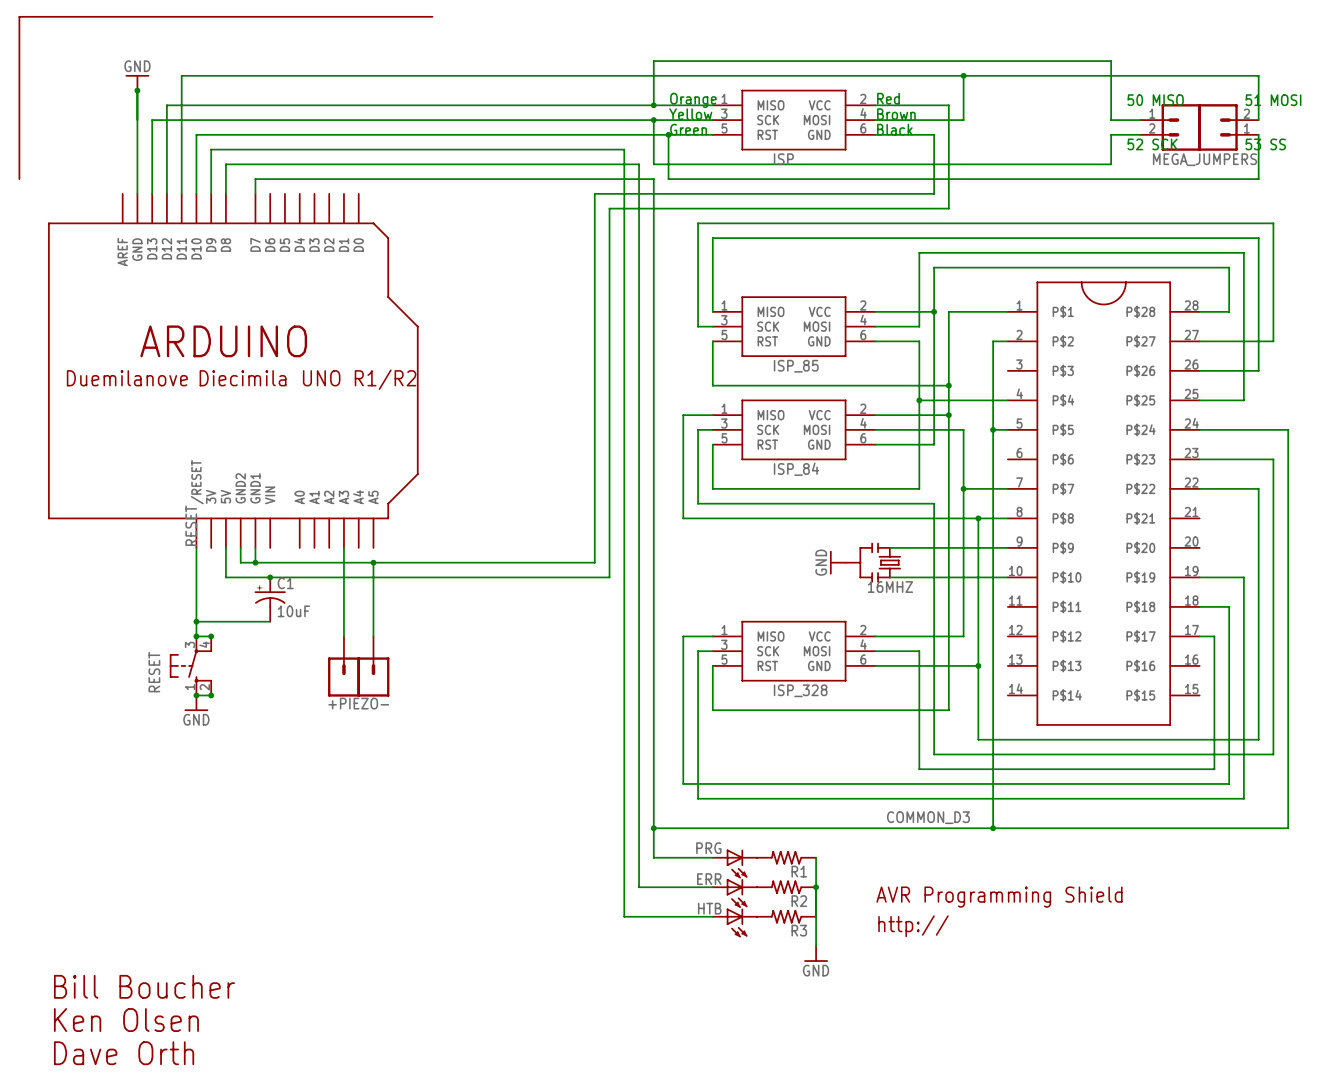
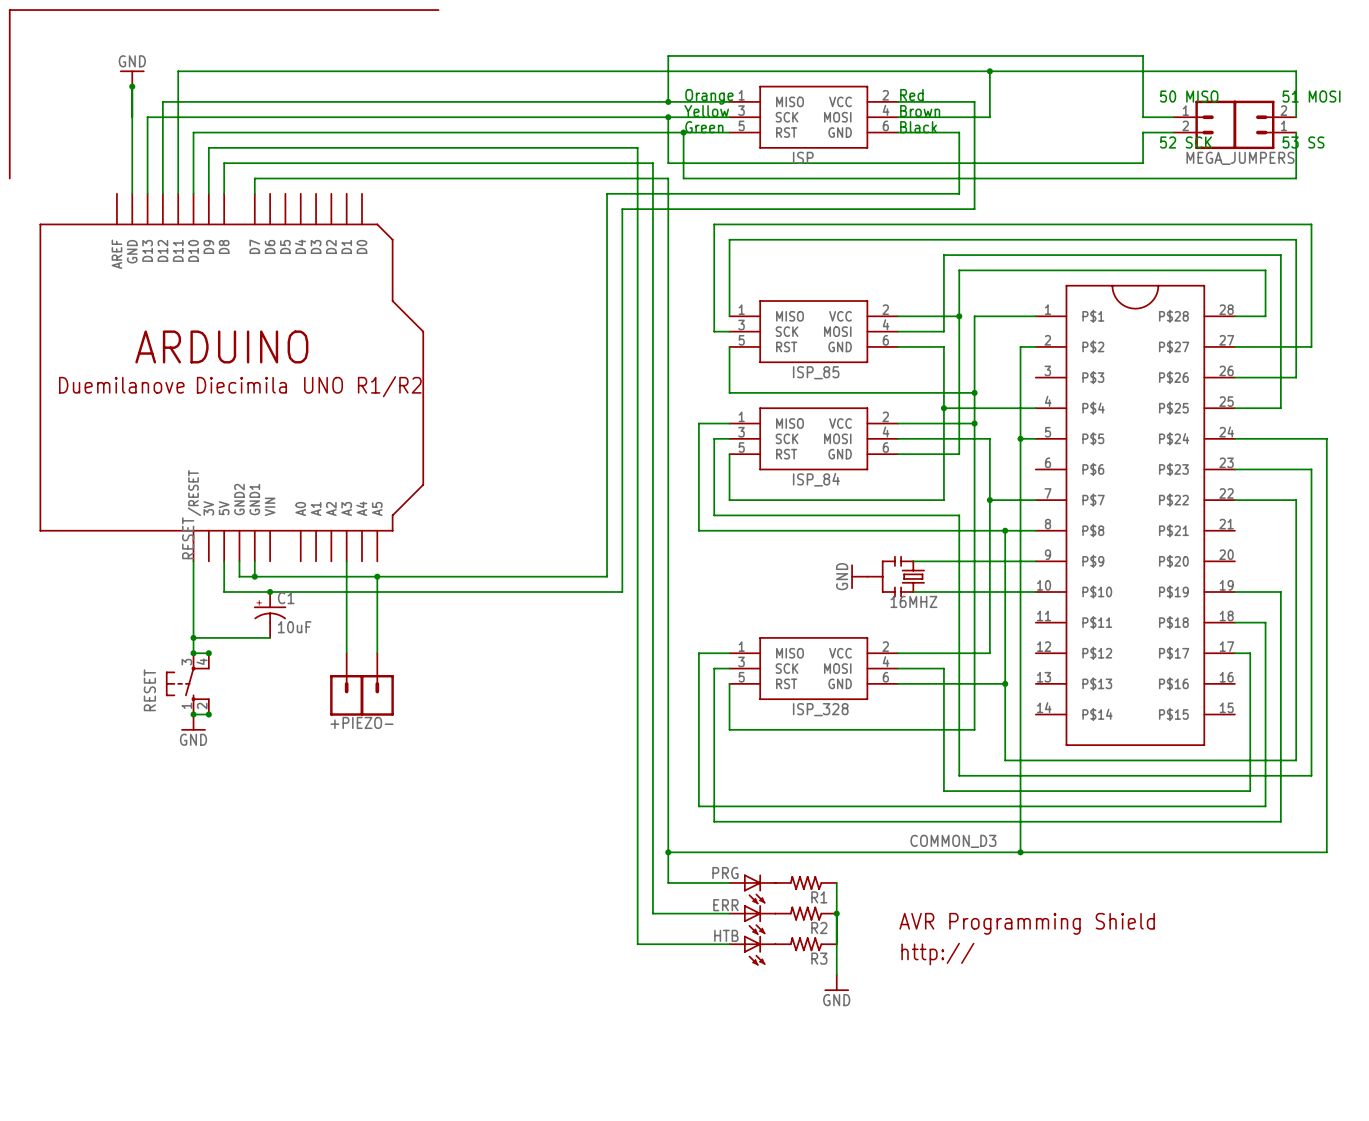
text: Bill Boucher (144, 986) -> none
text: Ken Olsen (126, 1020) -> none
text: Dave Orth (124, 1053) -> none

